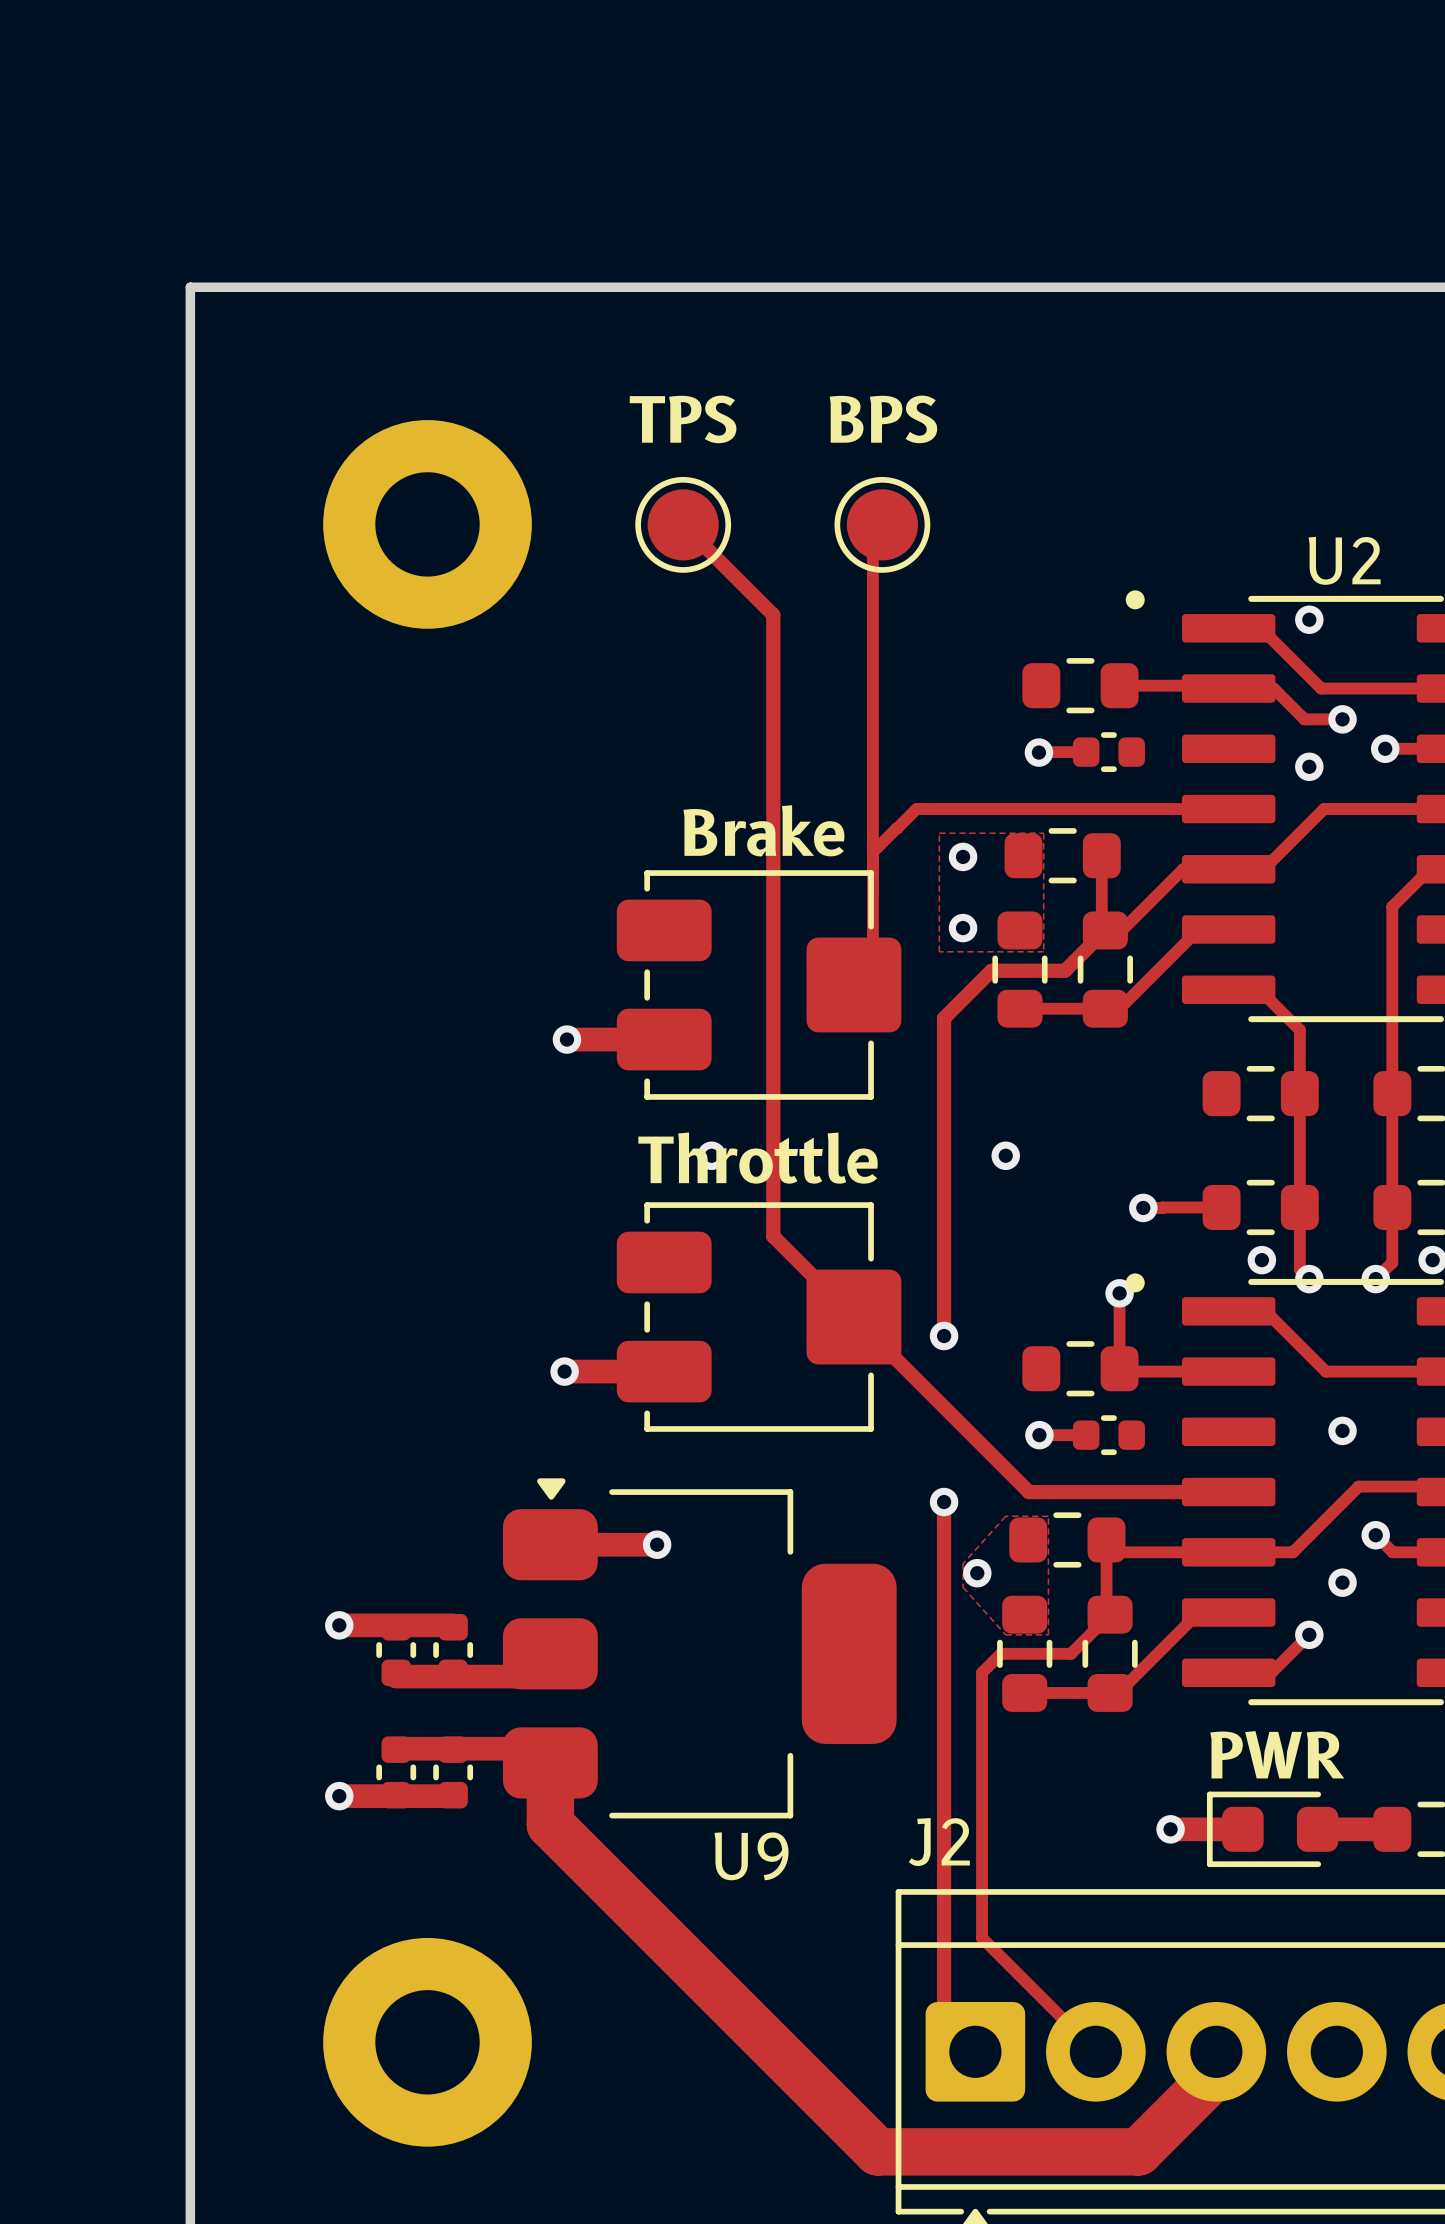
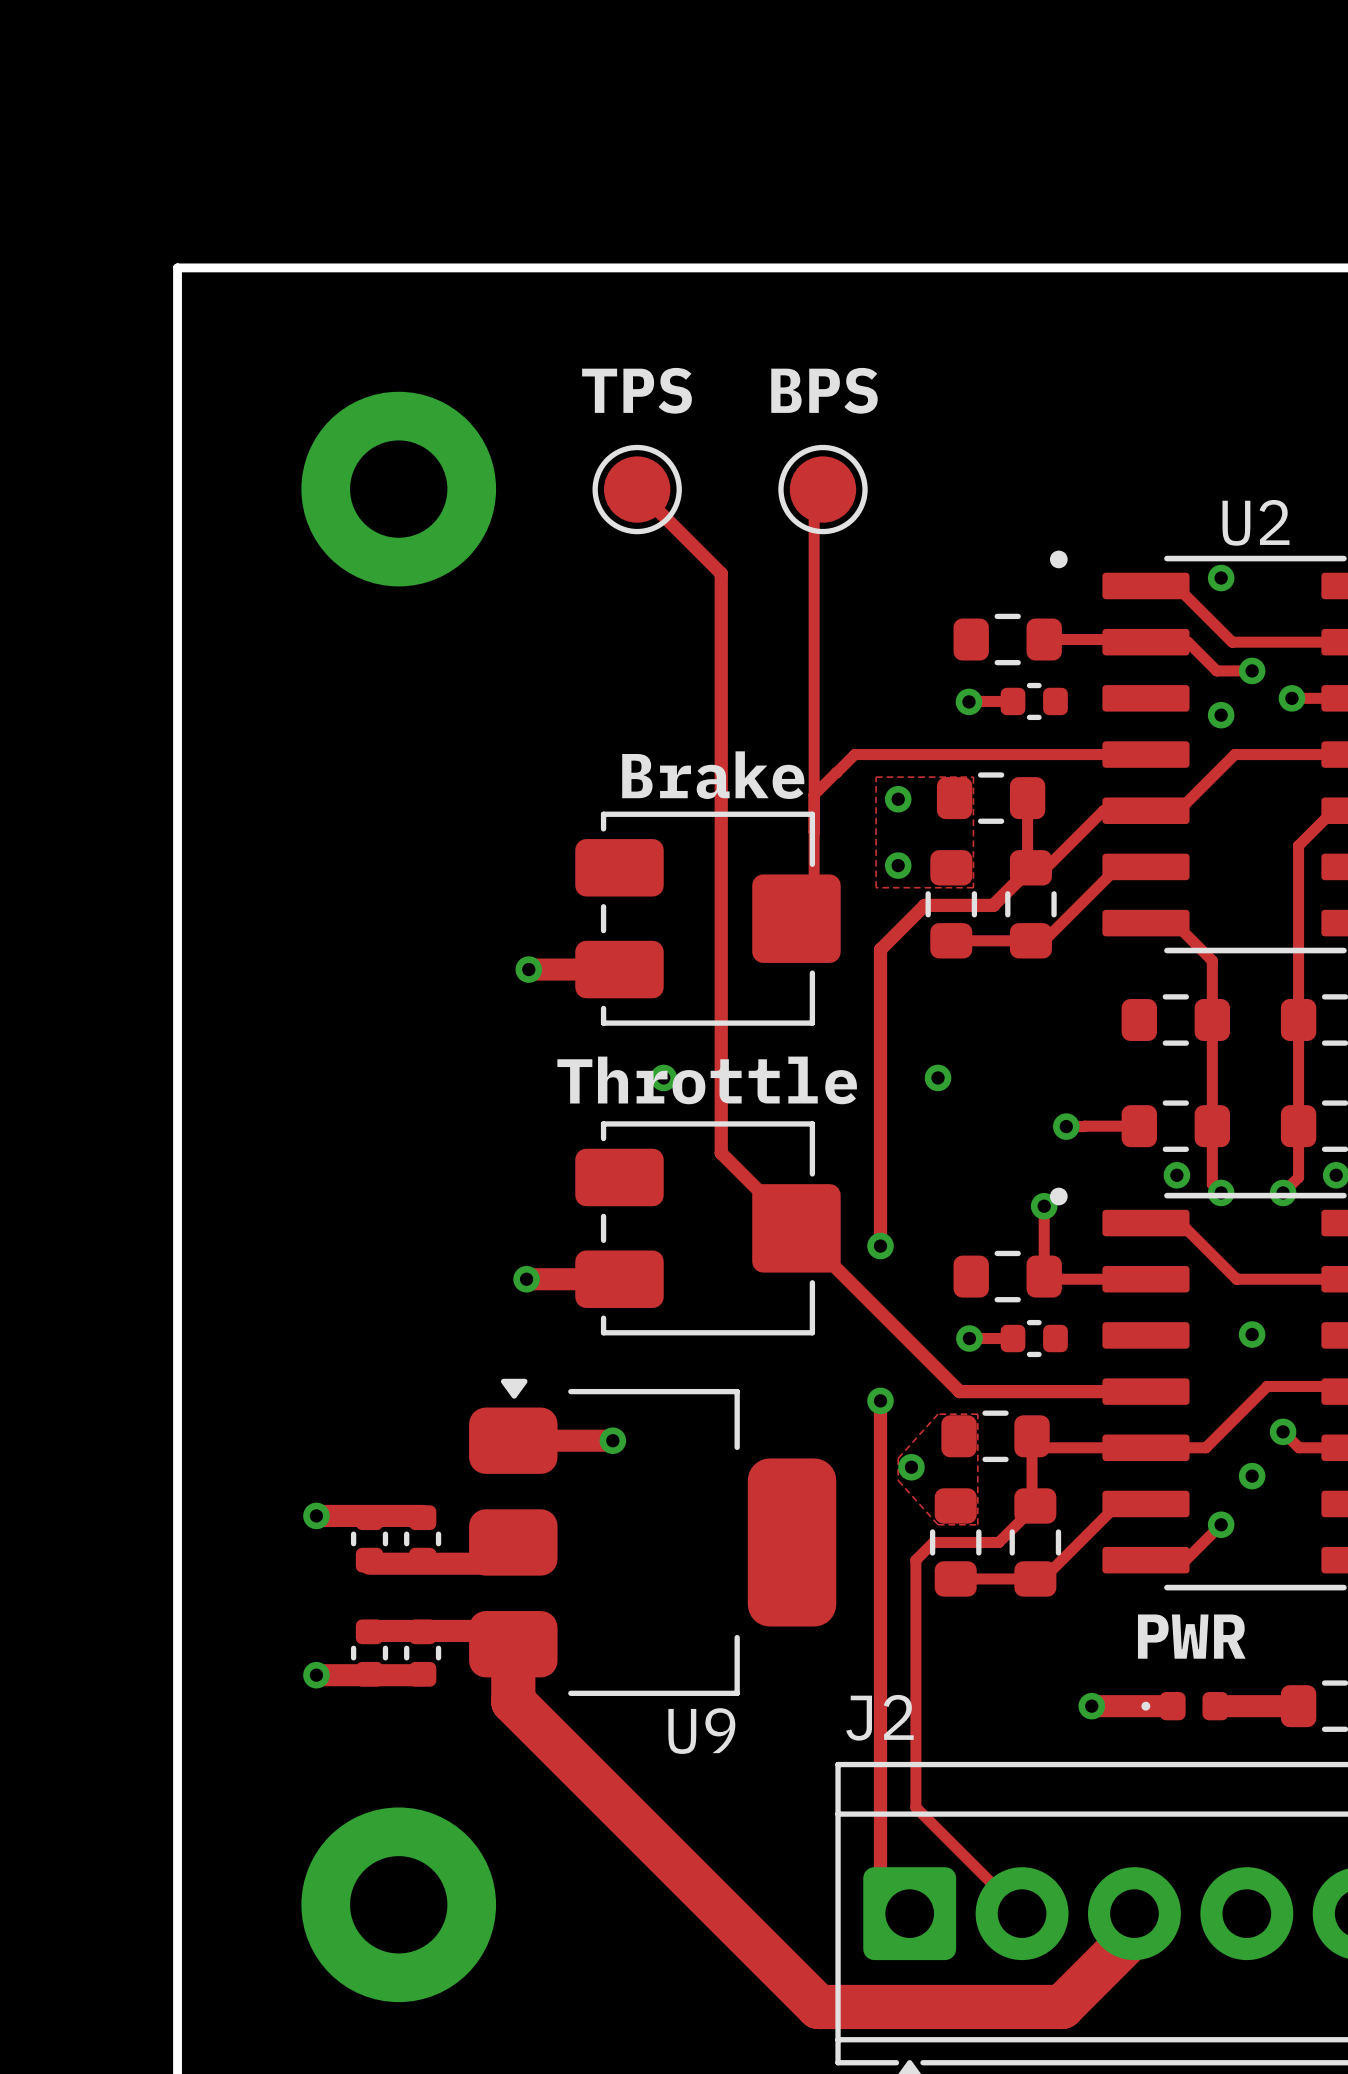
part footprint: [1206, 1791, 1339, 1868] -> [1141, 1692, 1229, 1721]

